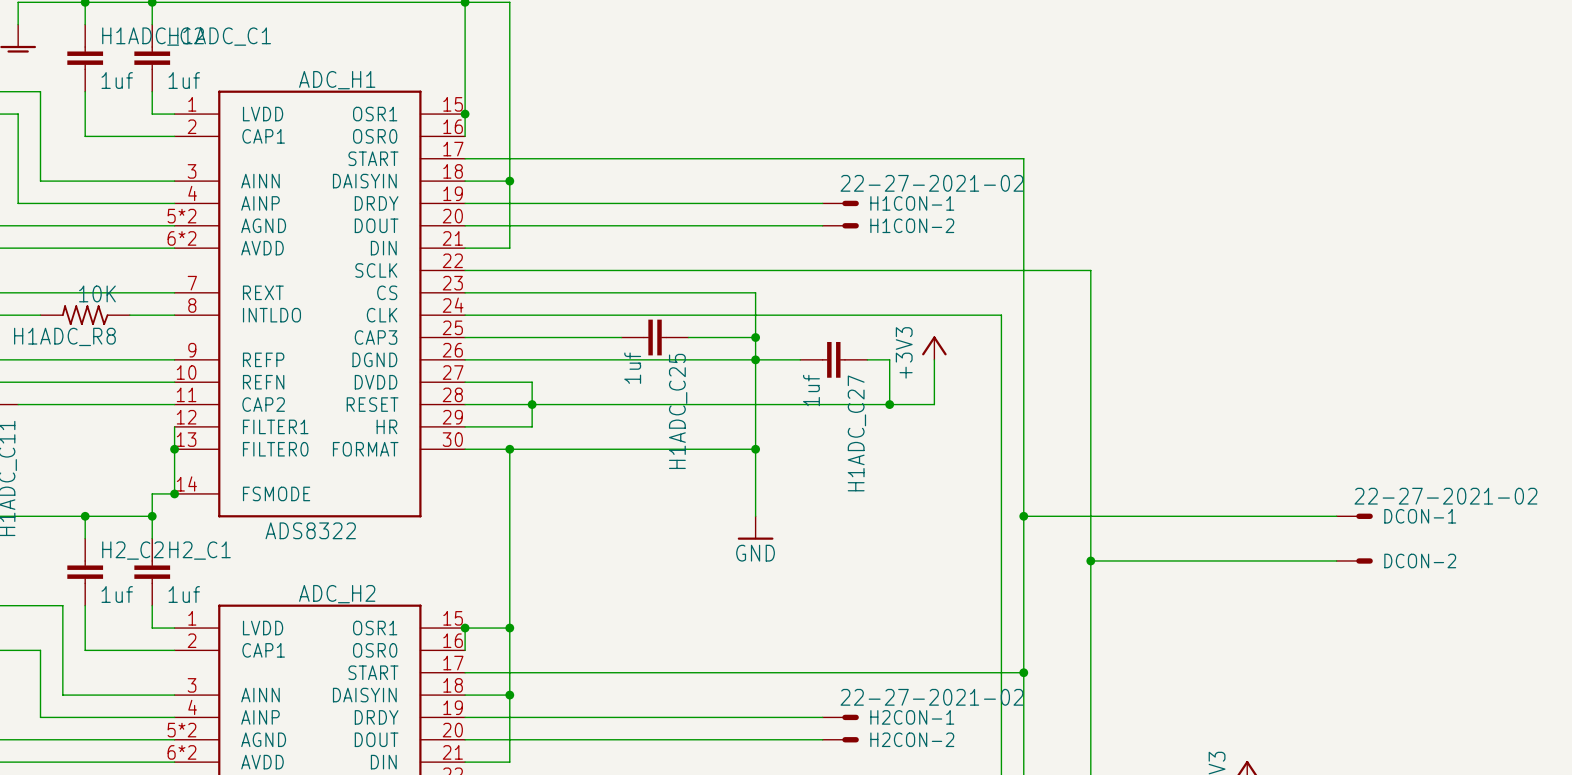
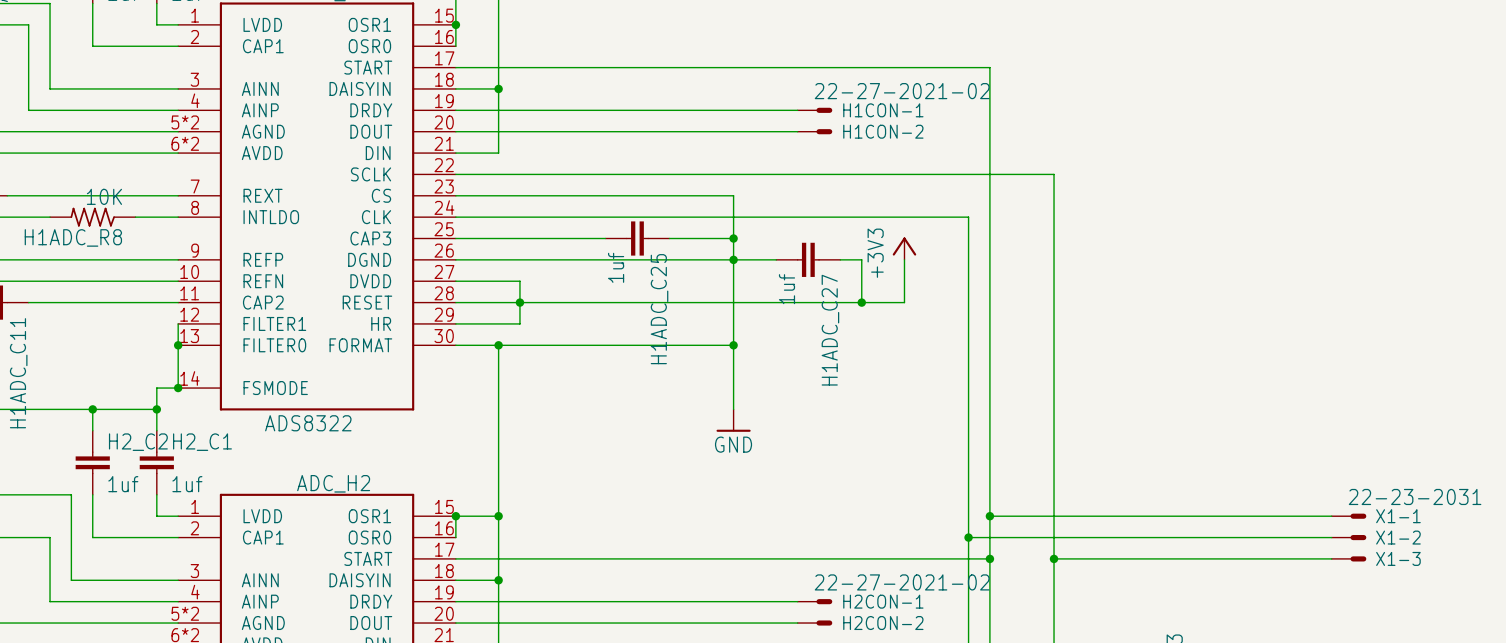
wire: (1023, 516) (1336, 516) -> none
junction: (1023, 516) -> none
DCON-1: 22-27-2021-02 (1354, 516) -> none
wire: (1090, 560) (1336, 560) -> none
junction: (1090, 560) -> none
DCON-2: (1354, 560) -> none
wire: none -> (989, 516) (1331, 516)
junction: none -> (989, 516)
X1-1: none -> 22-23-2031 (1349, 516)
wire: none -> (968, 537) (1331, 537)
junction: none -> (968, 537)
X1-2: none -> (1349, 537)
wire: none -> (1054, 558) (1331, 558)
junction: none -> (1054, 558)
X1-3: none -> (1349, 558)

